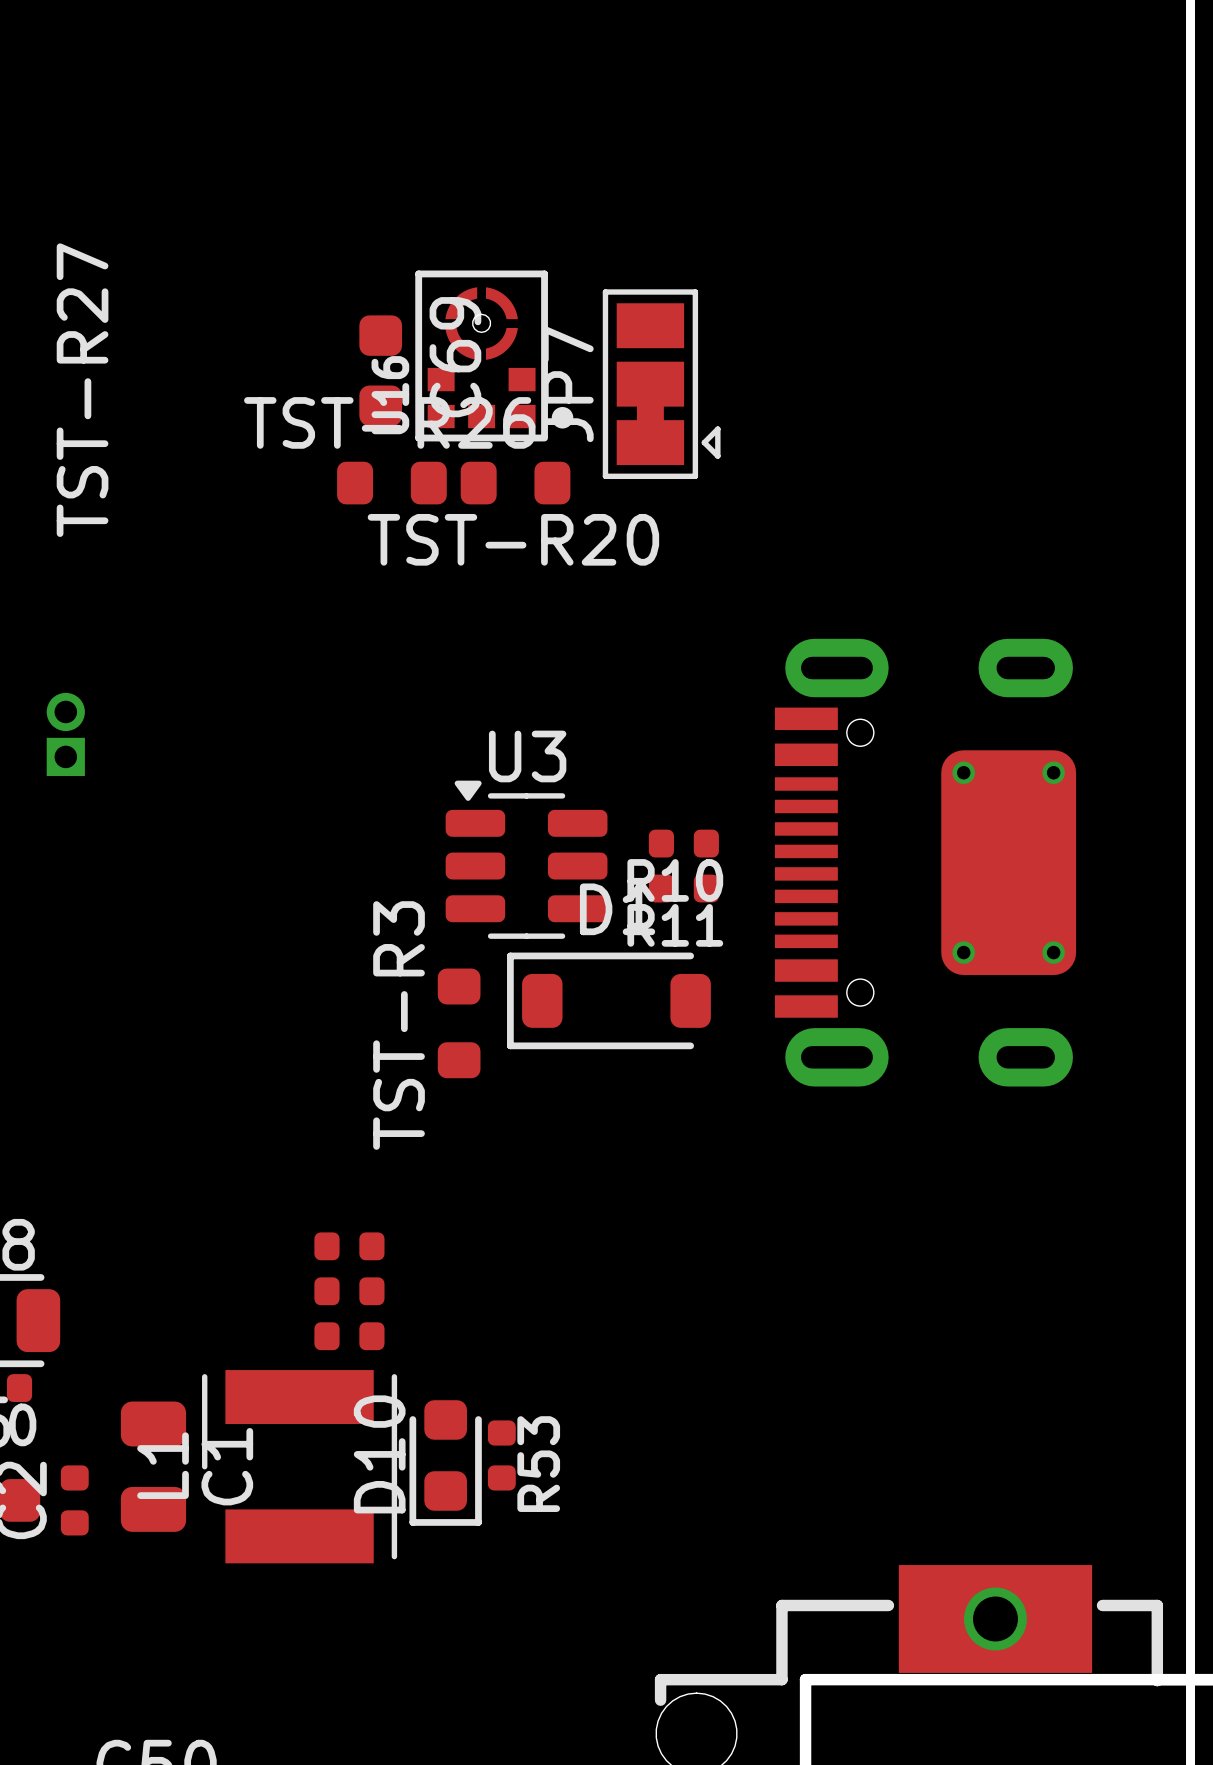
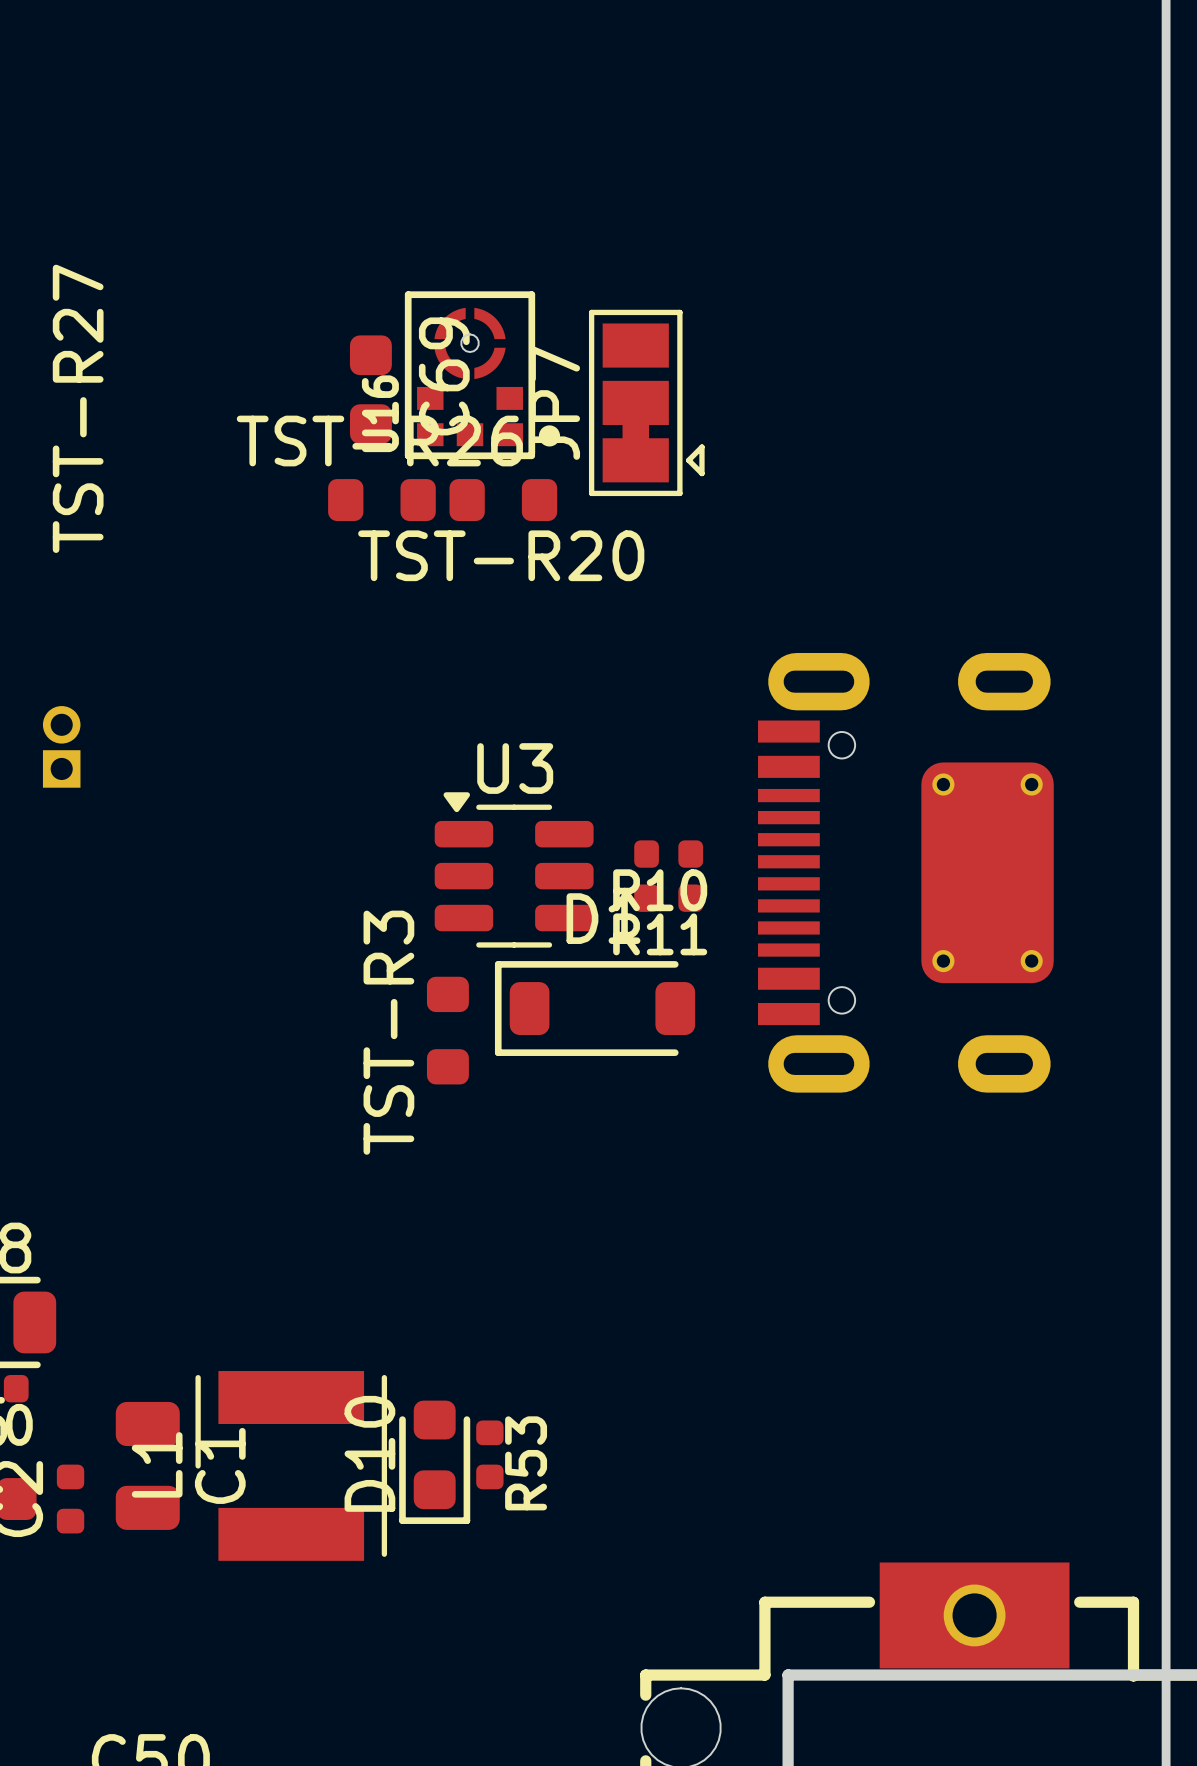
part: (349, 1246) -> none
part: (349, 1291) -> none
part: (349, 1336) -> none

